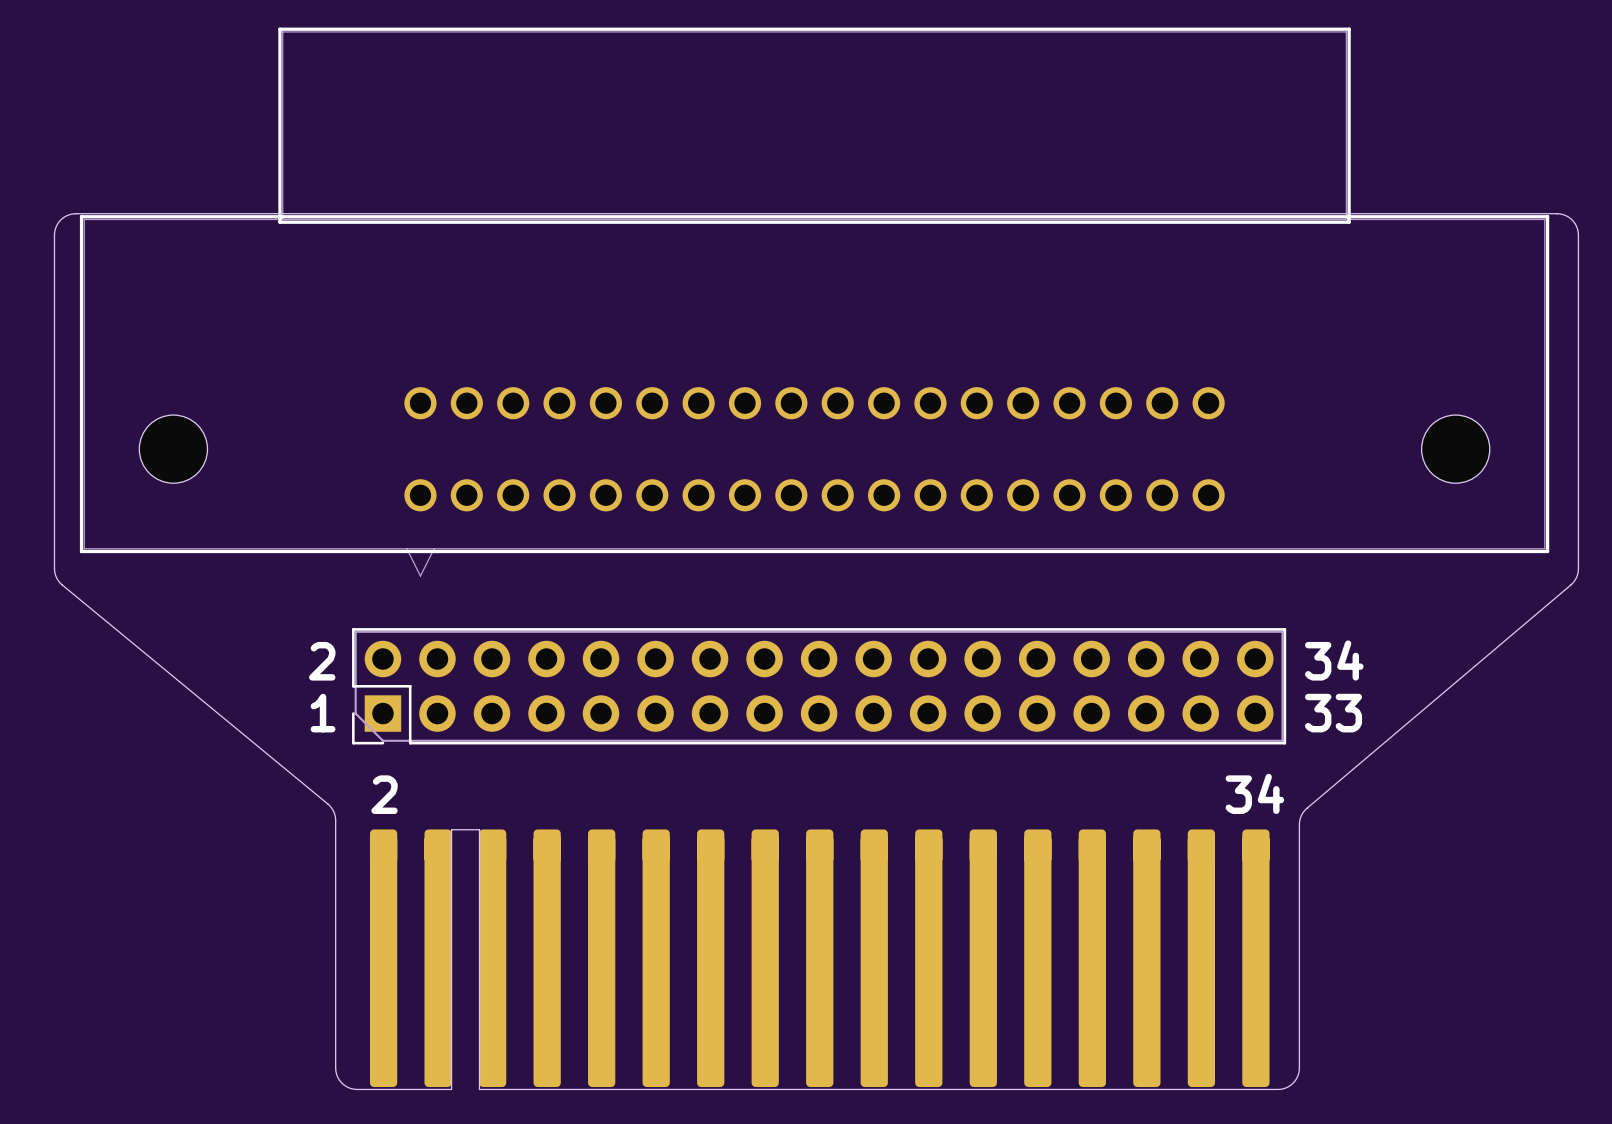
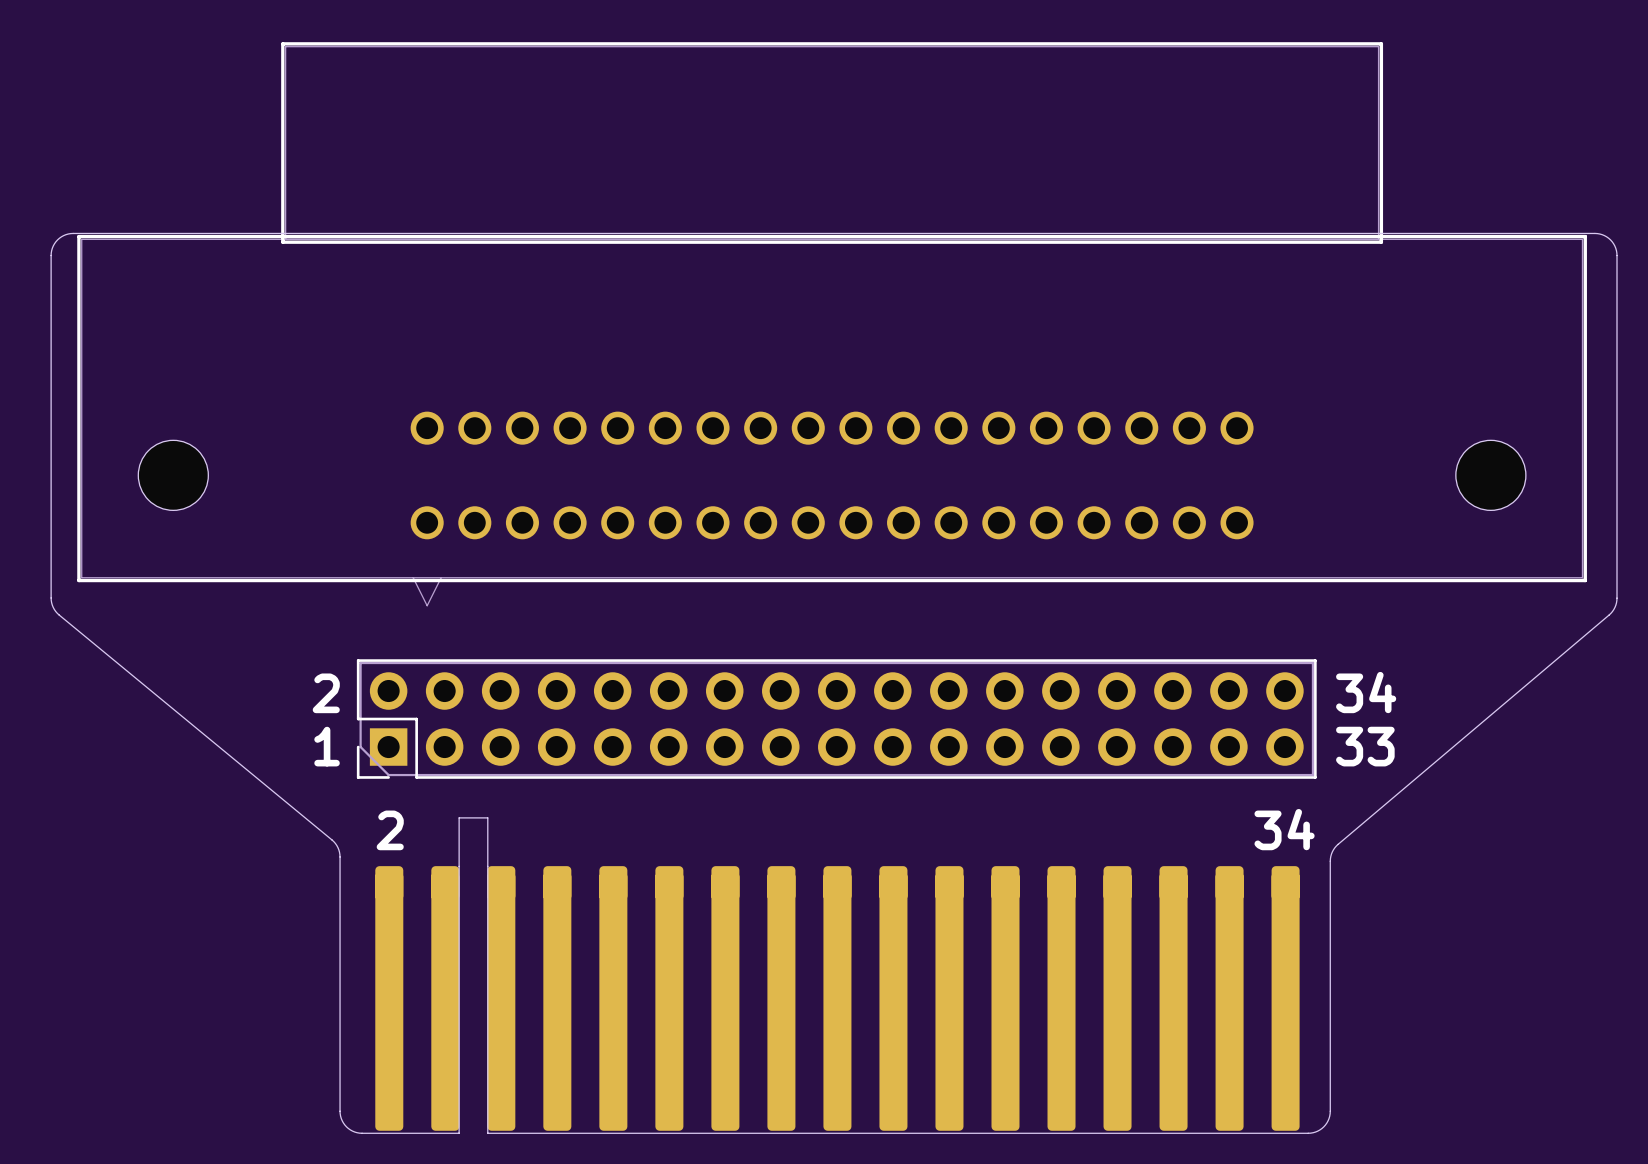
board edge: (451, 829) (479, 829) -> (459, 866) (459, 817) (487, 817) (487, 866)

